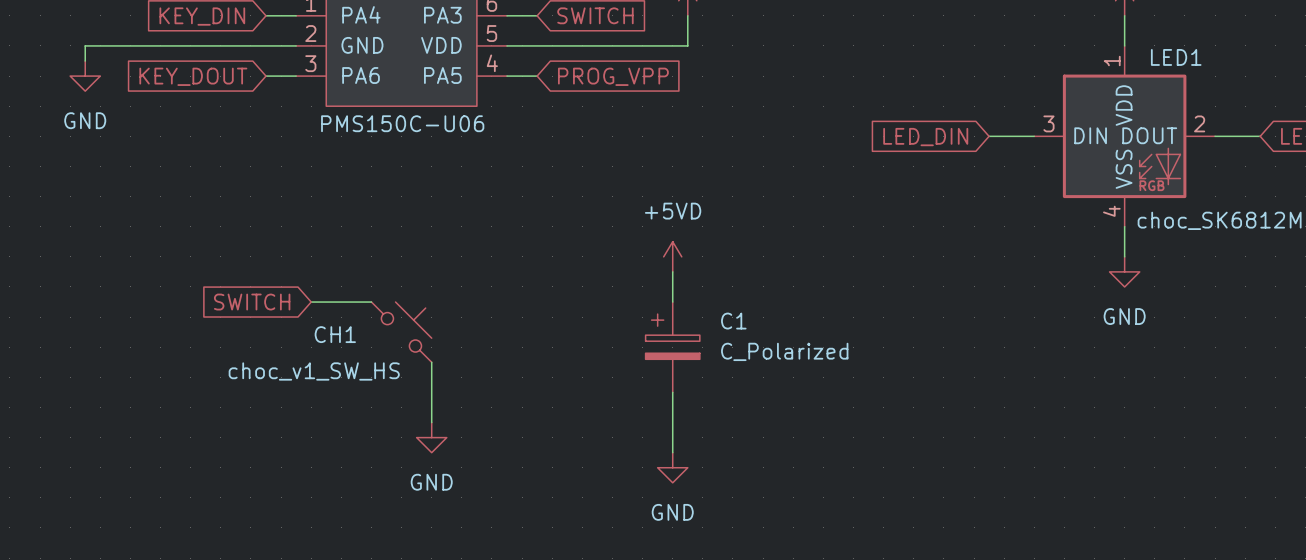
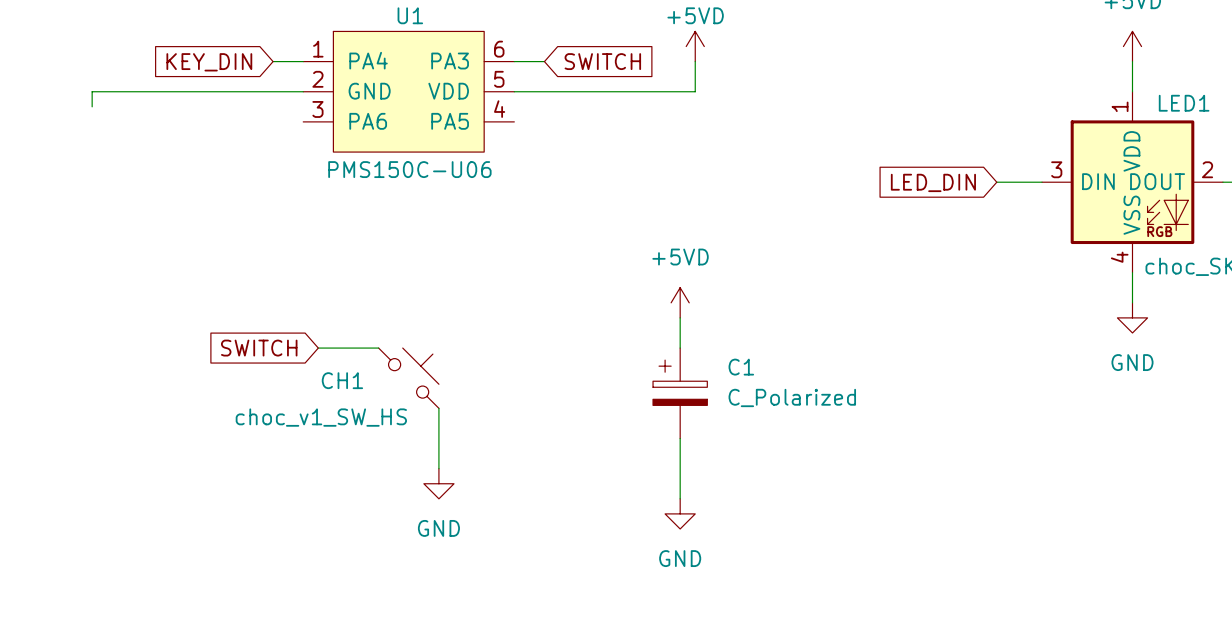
power symbol: GND (85, 76) -> none
global label: KEY_DOUT (193, 76) -> none
wire: (266, 76) (296, 76) -> none
wire: (507, 76) (537, 76) -> none
global label: PROG_VPP (613, 76) -> none

